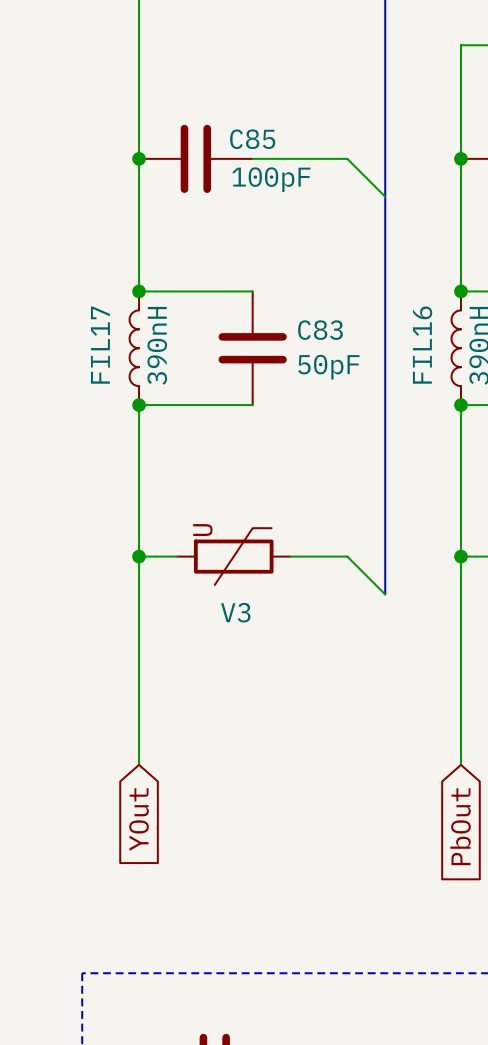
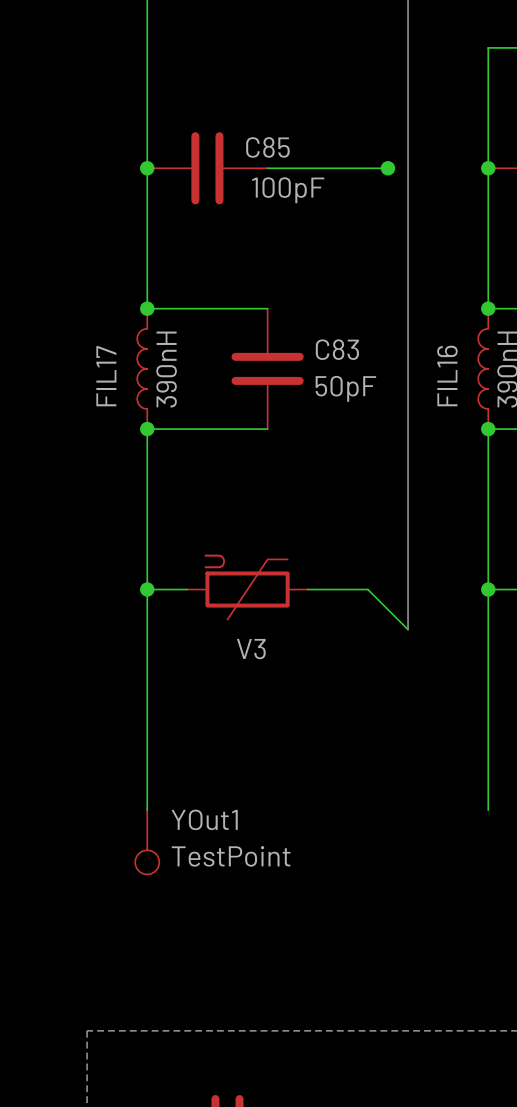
wire: (347, 158) (385, 196) -> (367, 168) (387, 168)
junction: none -> (387, 168)
YOut1: none -> TestPoint (147, 842)
global label: YOut (139, 819) -> none
global label: PbOut (460, 826) -> none

